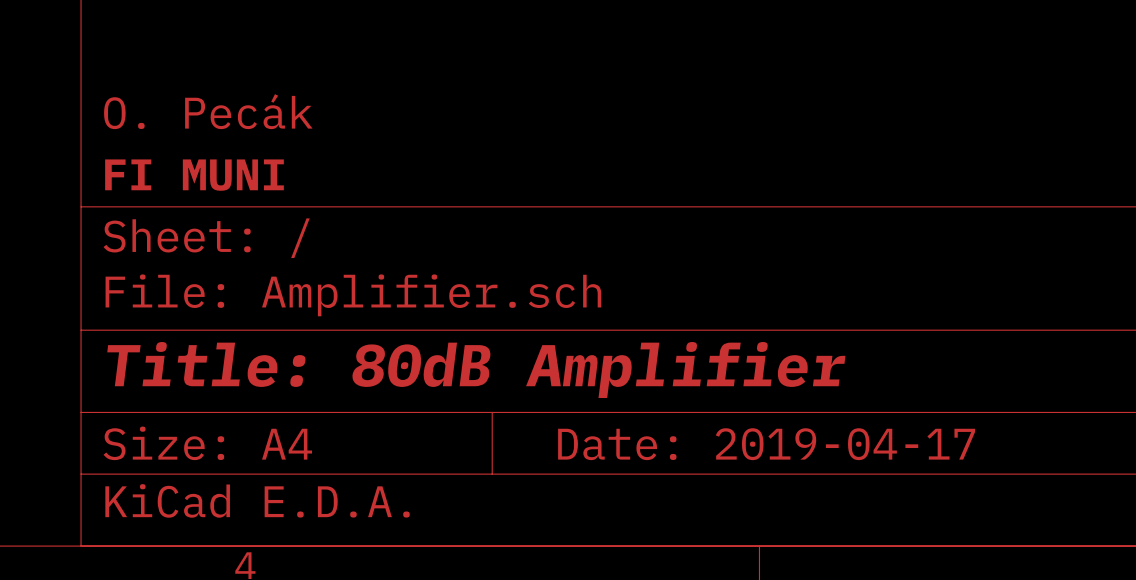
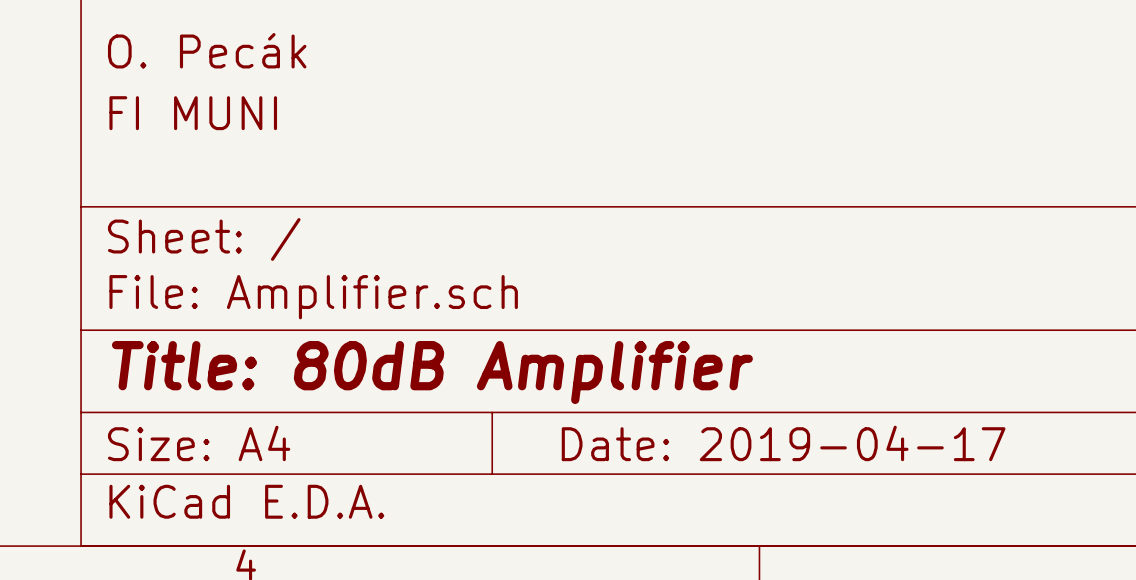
title block: none -> O. Pecák (207, 50)
title block: O. Pecák (208, 111) -> FI MUNI (193, 113)
title block: FI MUNI (194, 175) -> none

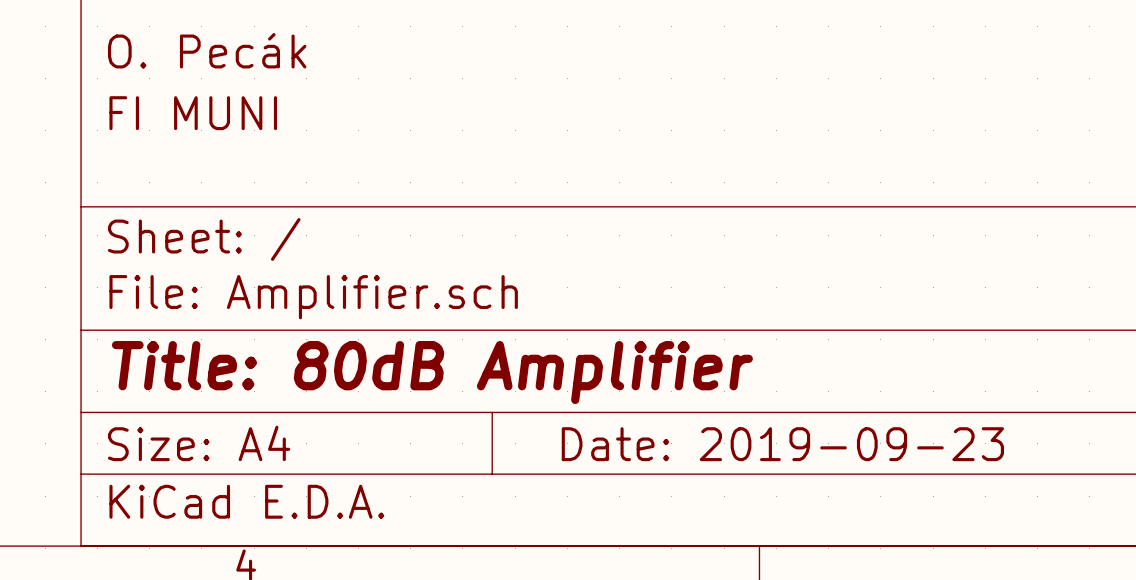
title block: Date: 2019-04-17 (783, 443) -> Date: 2019-09-23 (782, 444)

